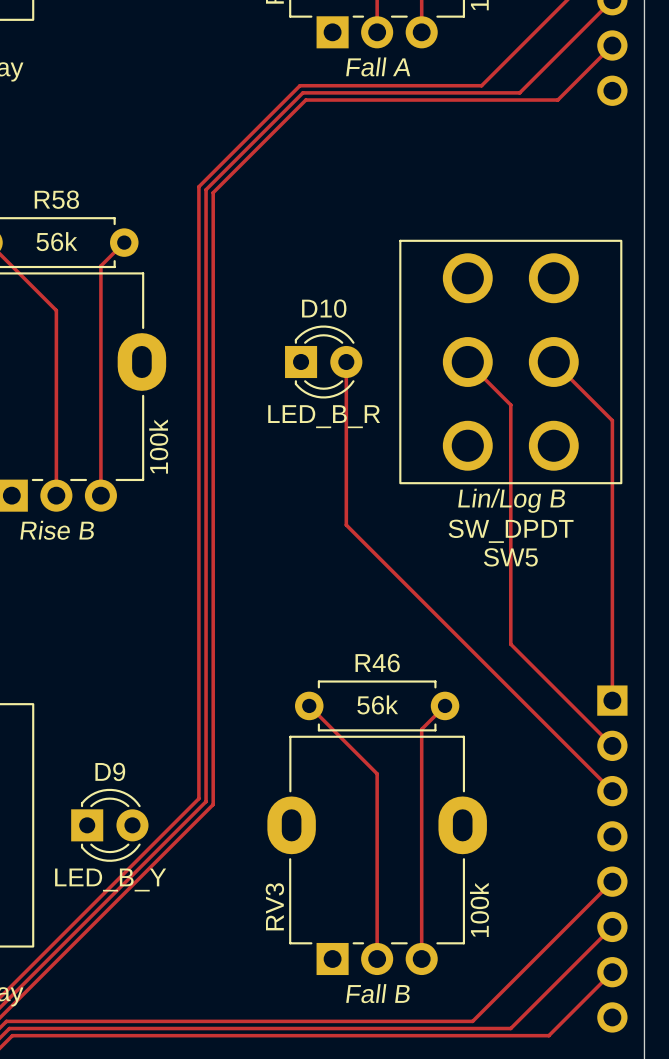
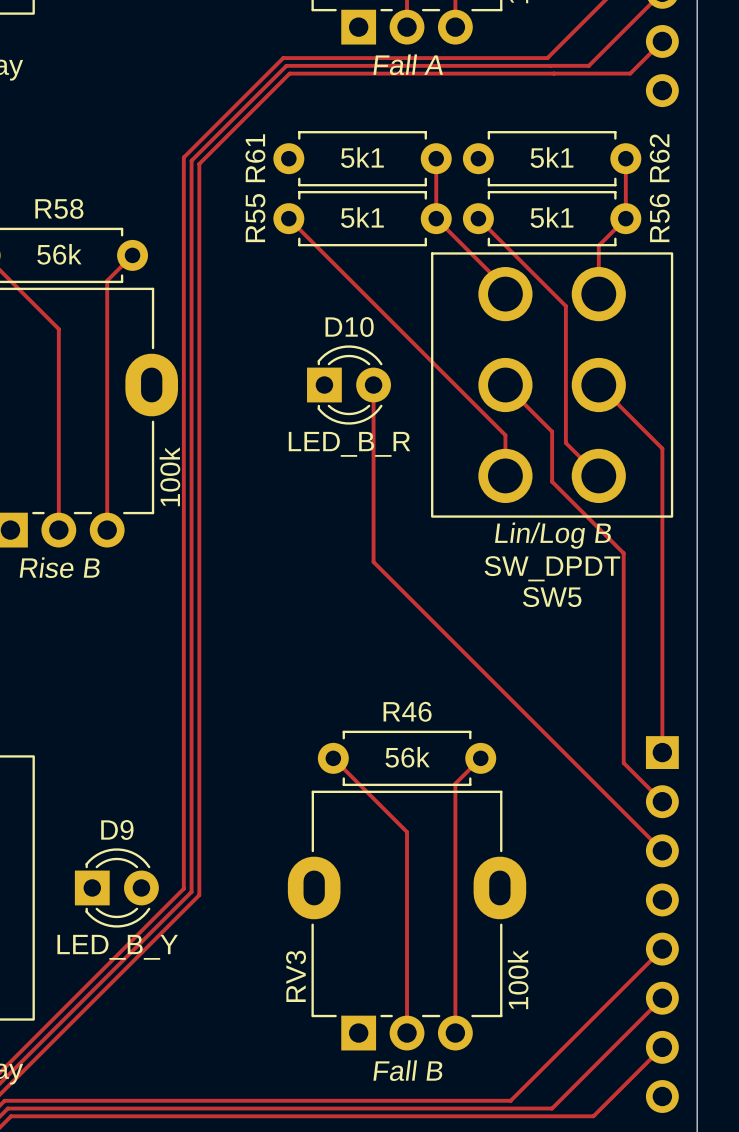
track: (506, 60) (481, 85) (299, 85) (198, 186) (198, 798) (171, 826) -> (547, 58) (283, 58) (183, 157) (183, 888)
track: (544, 67) (519, 92) (302, 92) (206, 189) (206, 801) (178, 829) -> (588, 65) (286, 65) (191, 160) (191, 891)
track: (582, 75) (557, 100) (305, 100) (213, 192) (213, 804) (185, 831) -> (630, 73) (289, 73) (199, 163) (199, 895)
R61: none -> 5k1 (362, 158)
track: none -> (436, 158) (436, 218) (505, 287) (505, 294)
R62: none -> 5k1 (552, 158)
track: none -> (625, 158) (625, 218) (598, 245) (598, 294)
track: none -> (288, 218) (505, 435) (505, 475)
R55: none -> 5k1 (362, 218)
track: none -> (478, 218) (565, 306) (565, 443) (598, 475)
R56: none -> 5k1 (552, 218)
track: (510, 451) (510, 644) (576, 710) -> (552, 481) (623, 553) (623, 763)

